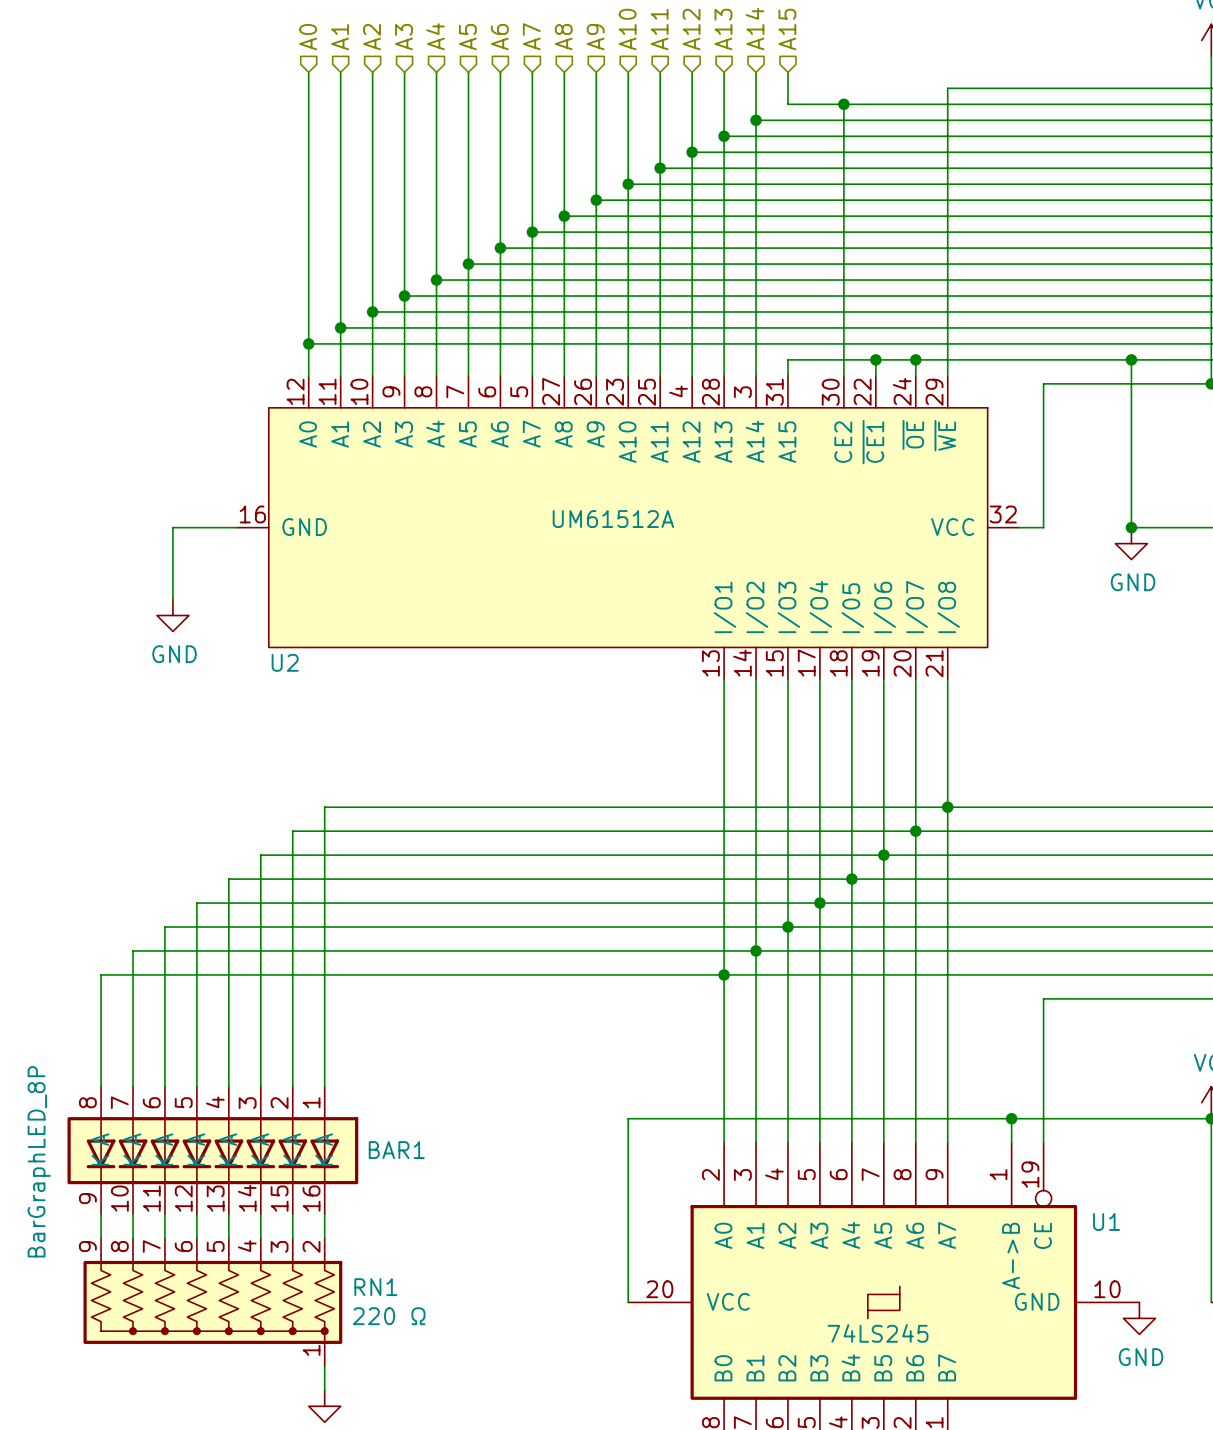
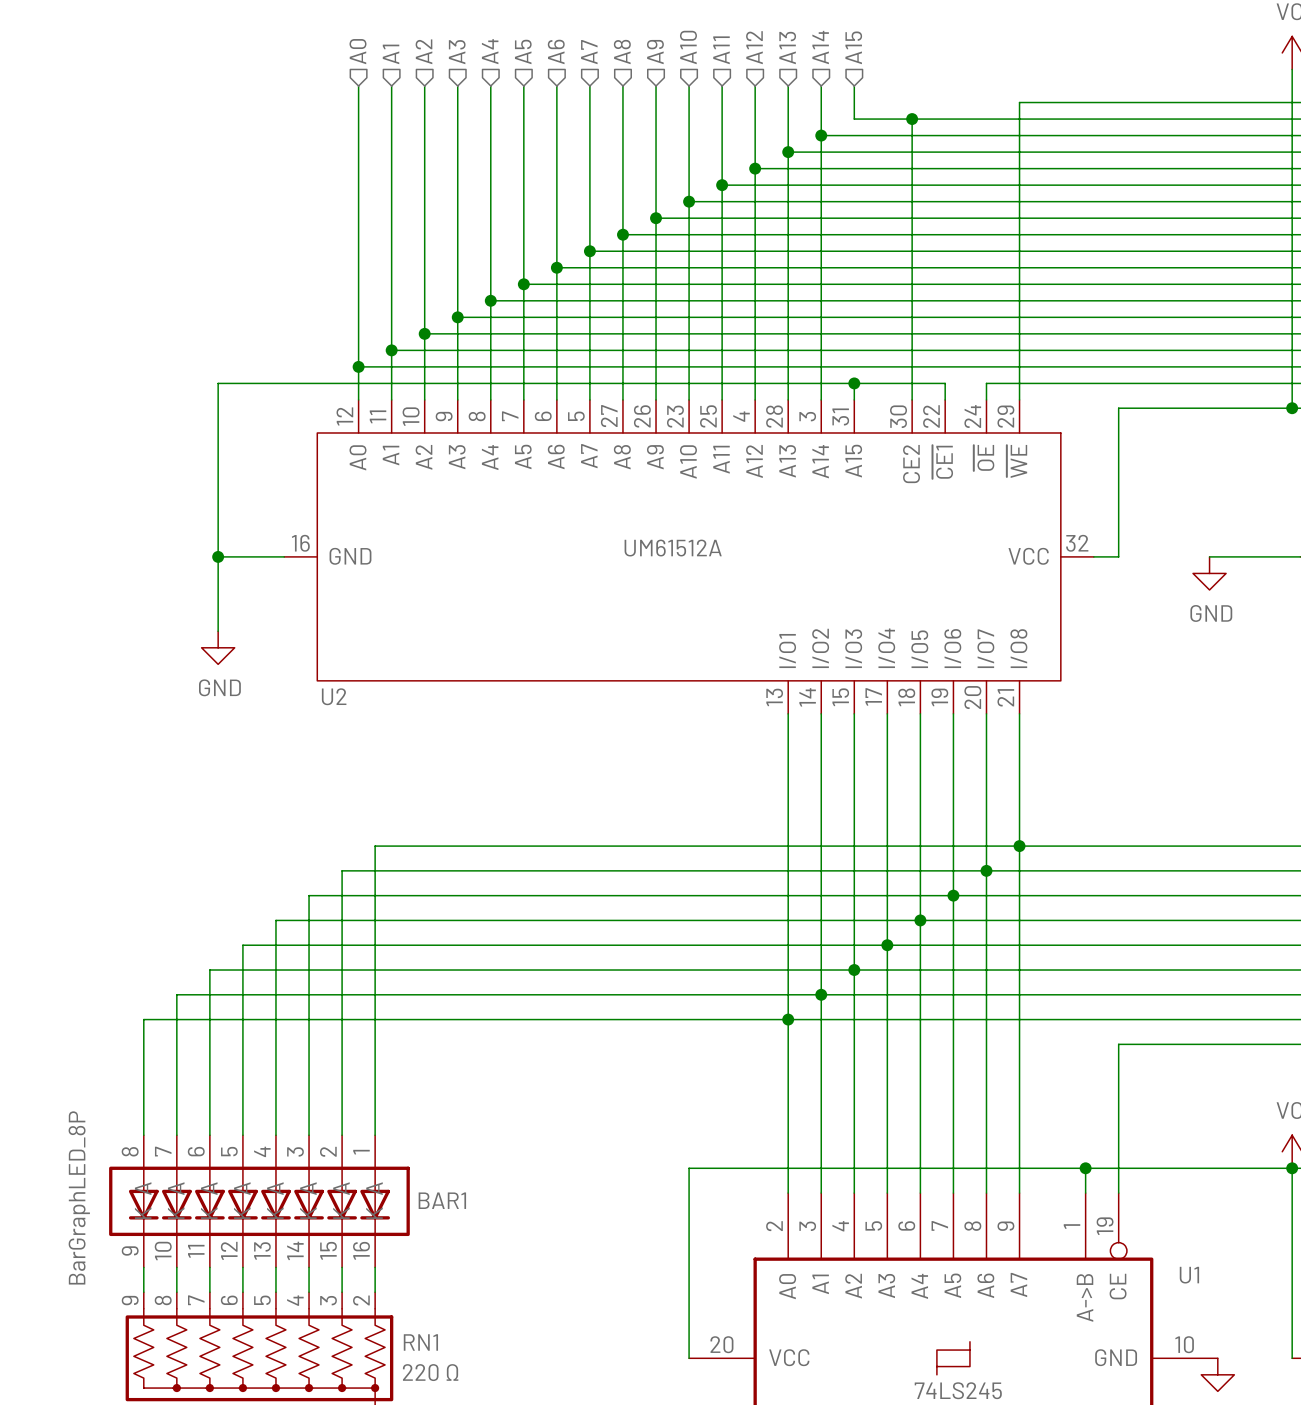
wire: none -> (854, 383) (218, 383) (218, 556)
junction: none -> (854, 383)
wire: (875, 359) (915, 359) -> none
junction: (875, 359) -> none
junction: (915, 359) -> none
wire: (1131, 359) (1131, 527) -> none
junction: (1131, 359) -> none
junction: none -> (218, 556)
junction: (1131, 527) -> none

